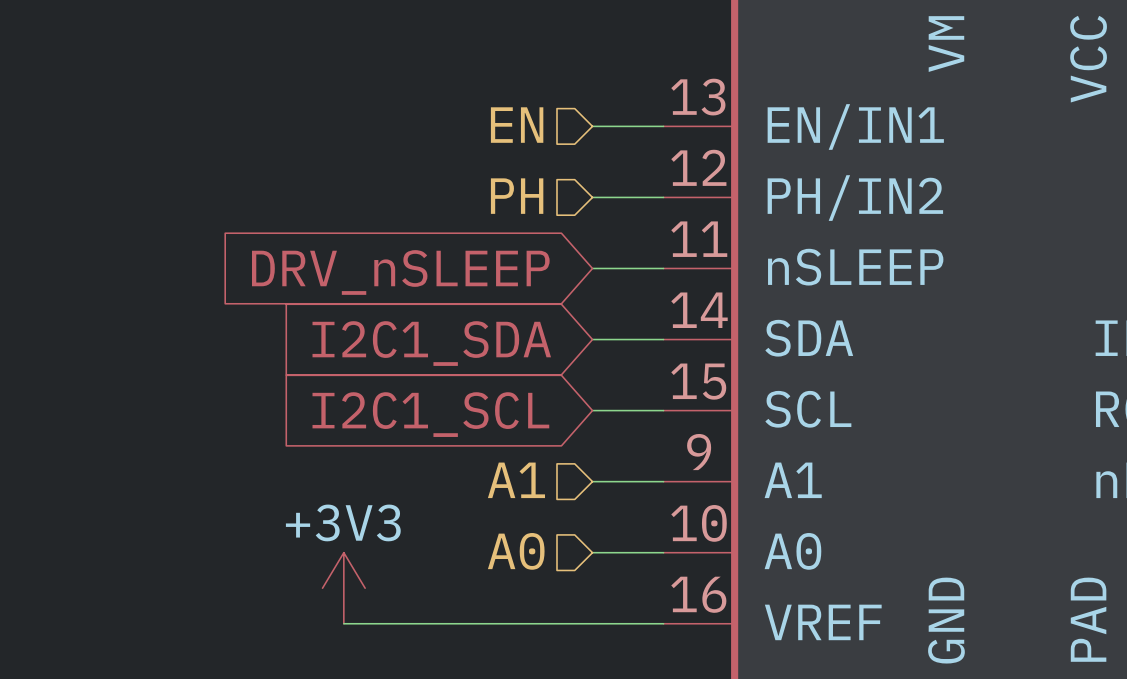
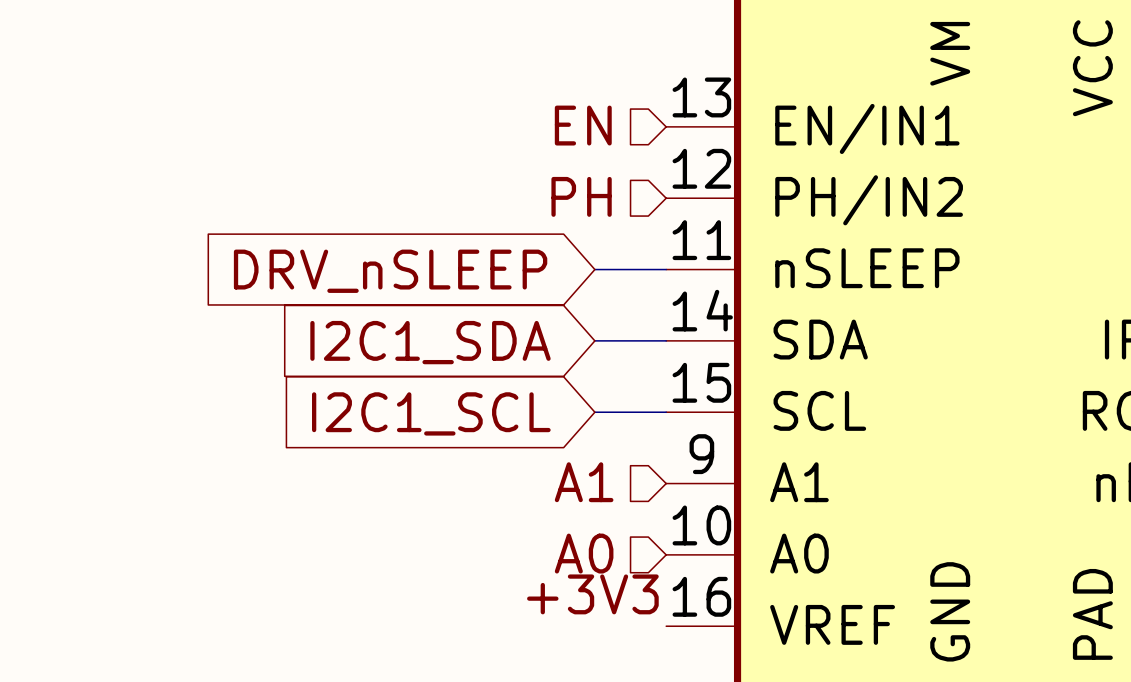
hierarchical label position: EN (517, 125) -> EN (583, 125)
wire: (592, 126) (663, 126) -> none
hierarchical label position: PH (517, 196) -> PH (581, 196)
wire: (592, 197) (663, 197) -> none
hierarchical label position: A1 (516, 480) -> A1 (584, 482)
wire: (592, 481) (663, 481) -> none
hierarchical label position: A0 (516, 551) -> A0 (584, 553)
wire: (592, 552) (663, 552) -> none
power symbol: +3V3 (343, 588) -> none
label: none -> +3V3 (592, 594)
wire: (343, 623) (663, 623) -> none

